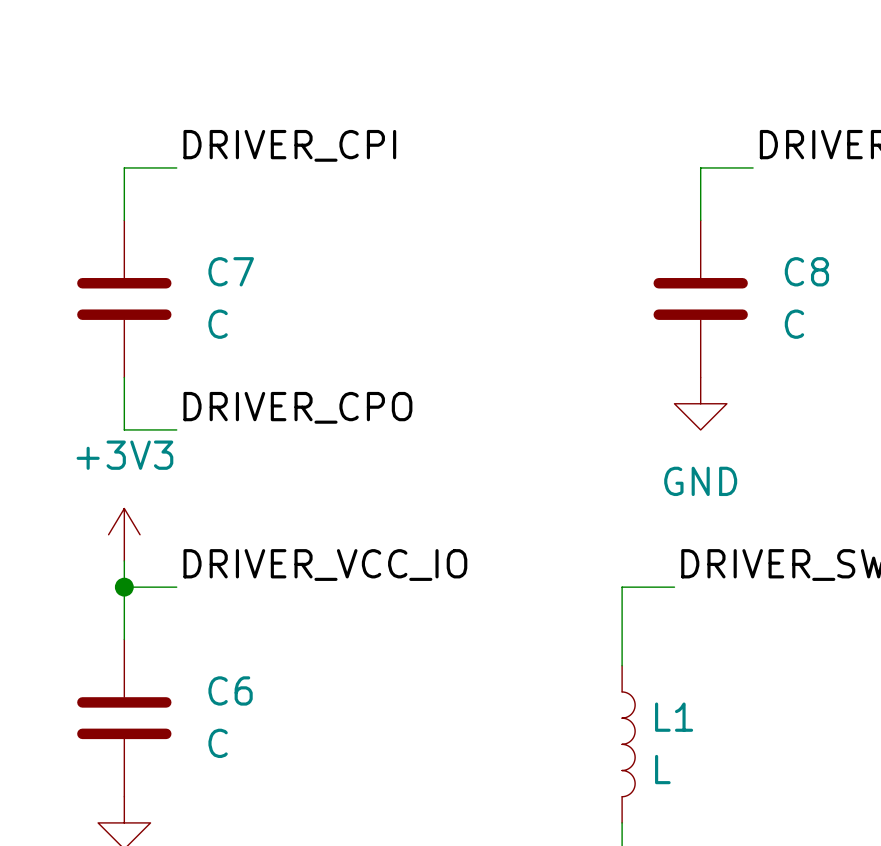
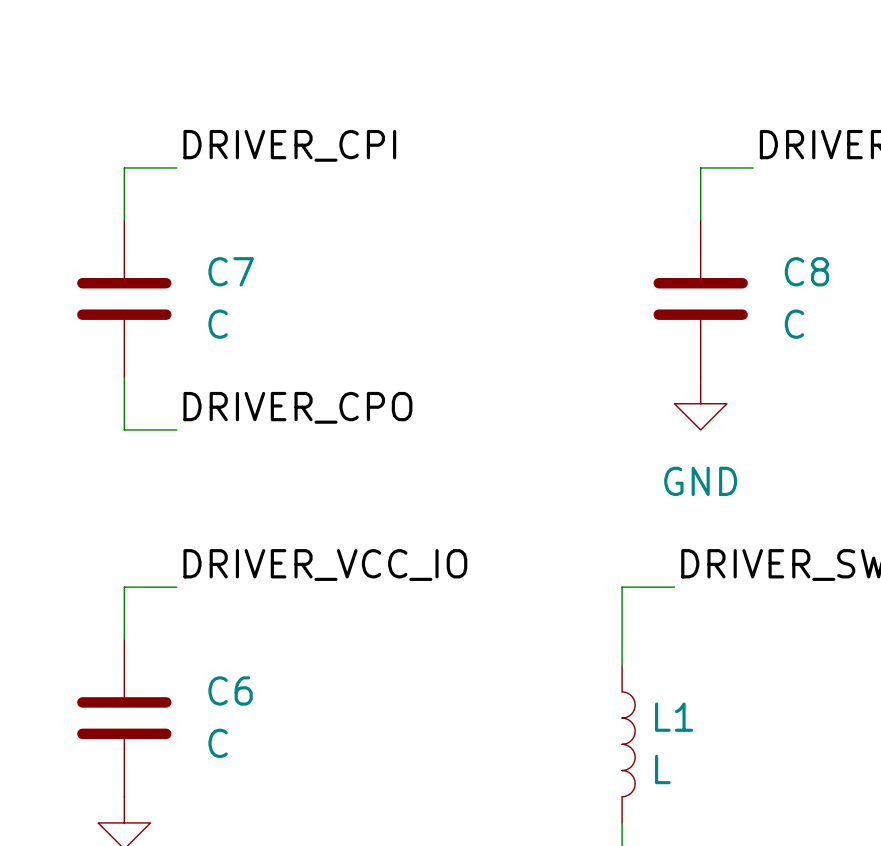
power symbol: +3V3 (124, 534) -> none
wire: (124, 560) (124, 587) -> none
junction: (124, 587) -> none

